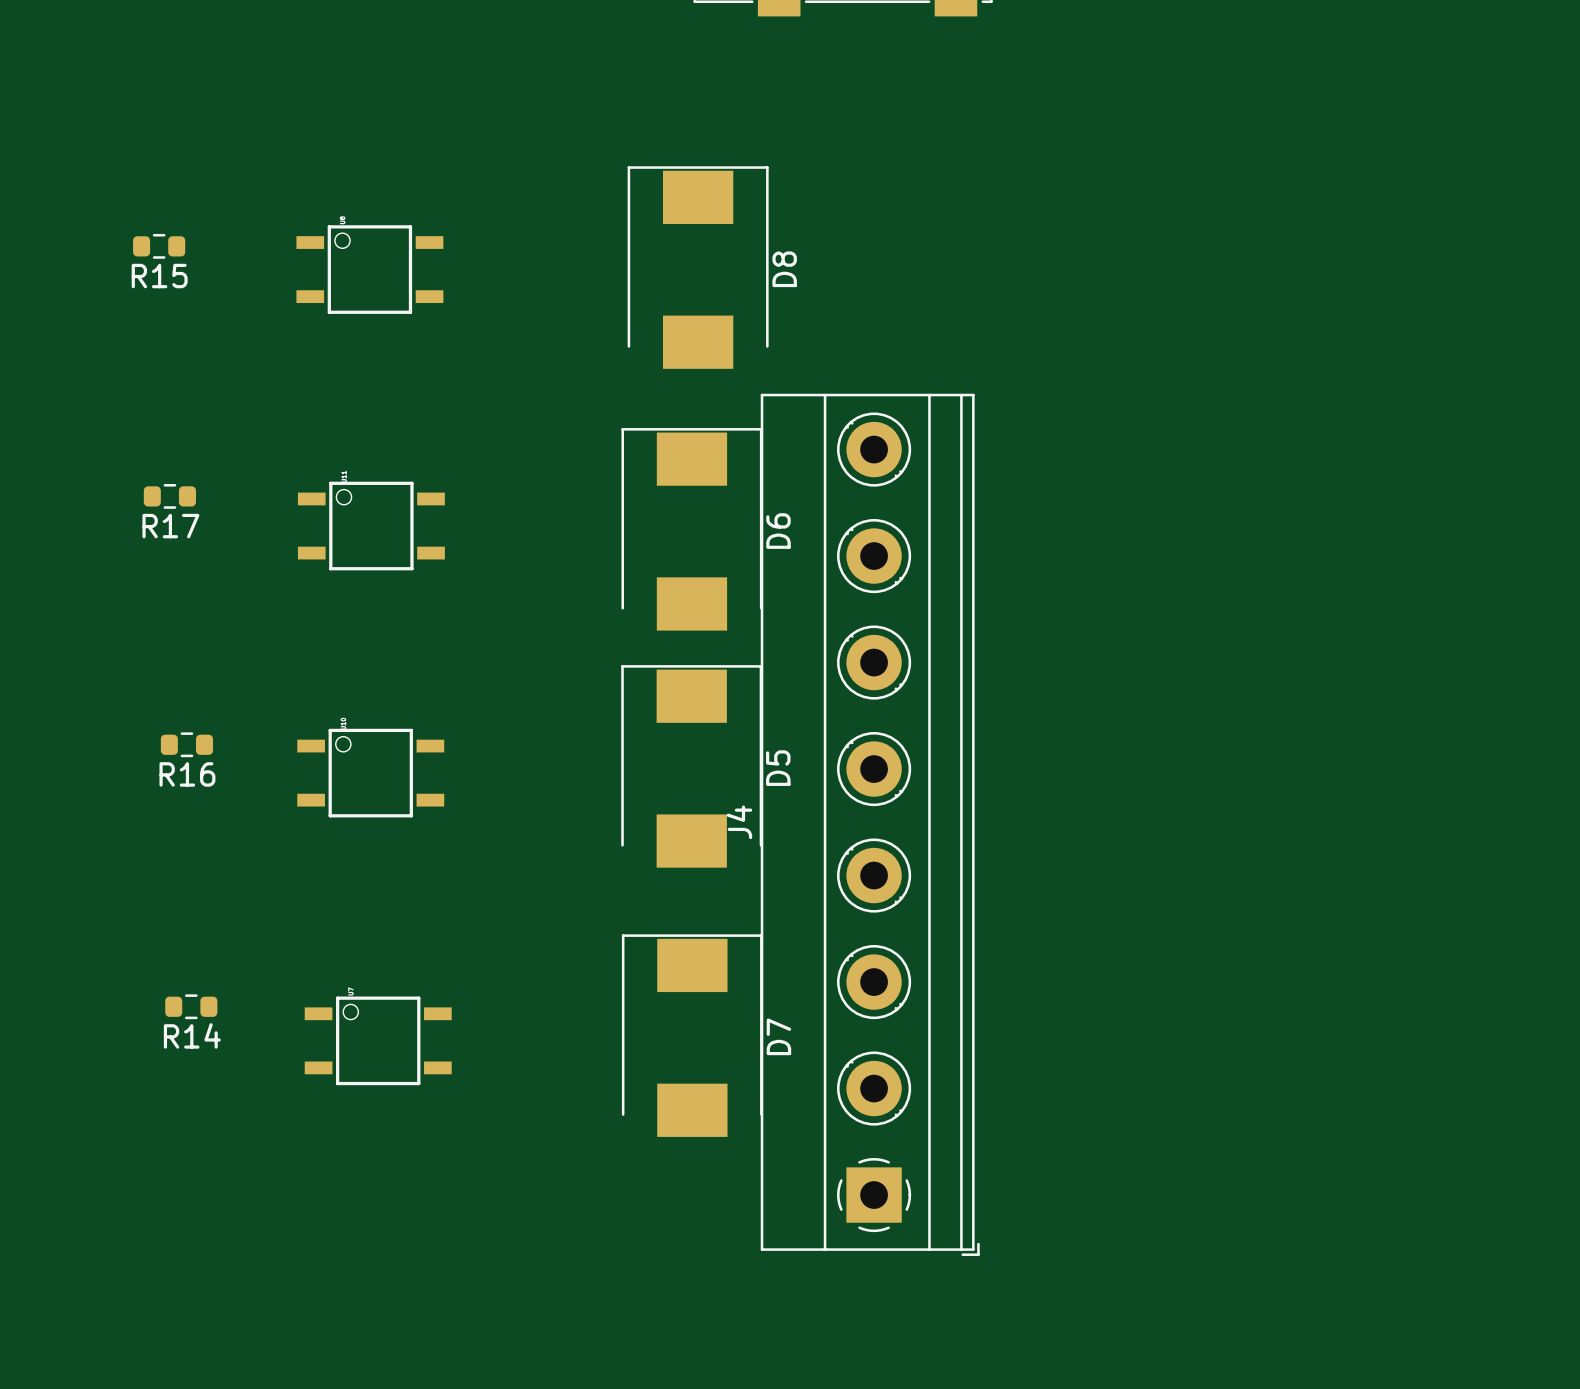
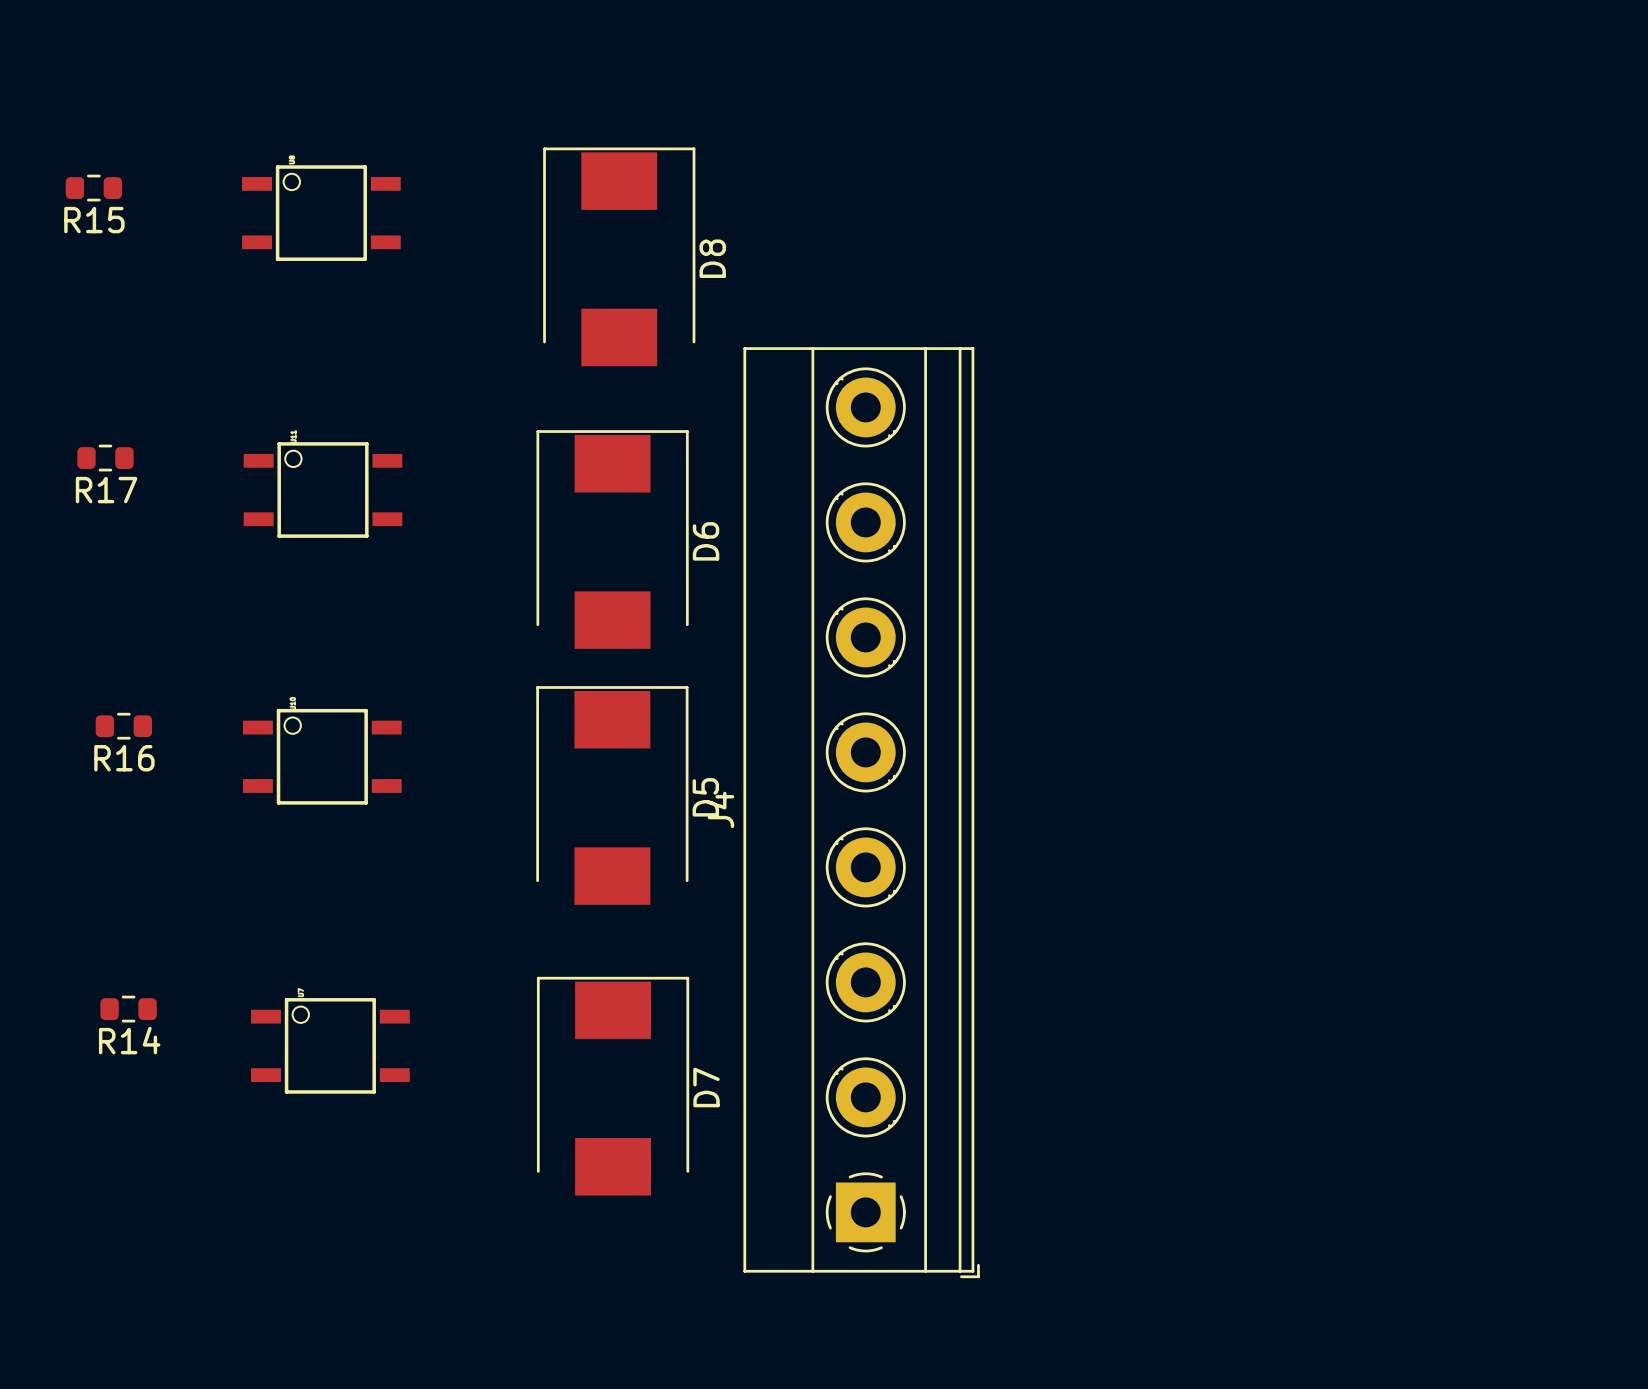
D8 position: (698, 267) -> (619, 256)
D6 position: (691, 529) -> (612, 539)
D5 position: (691, 766) -> (612, 795)
D7 position: (692, 1035) -> (613, 1086)

